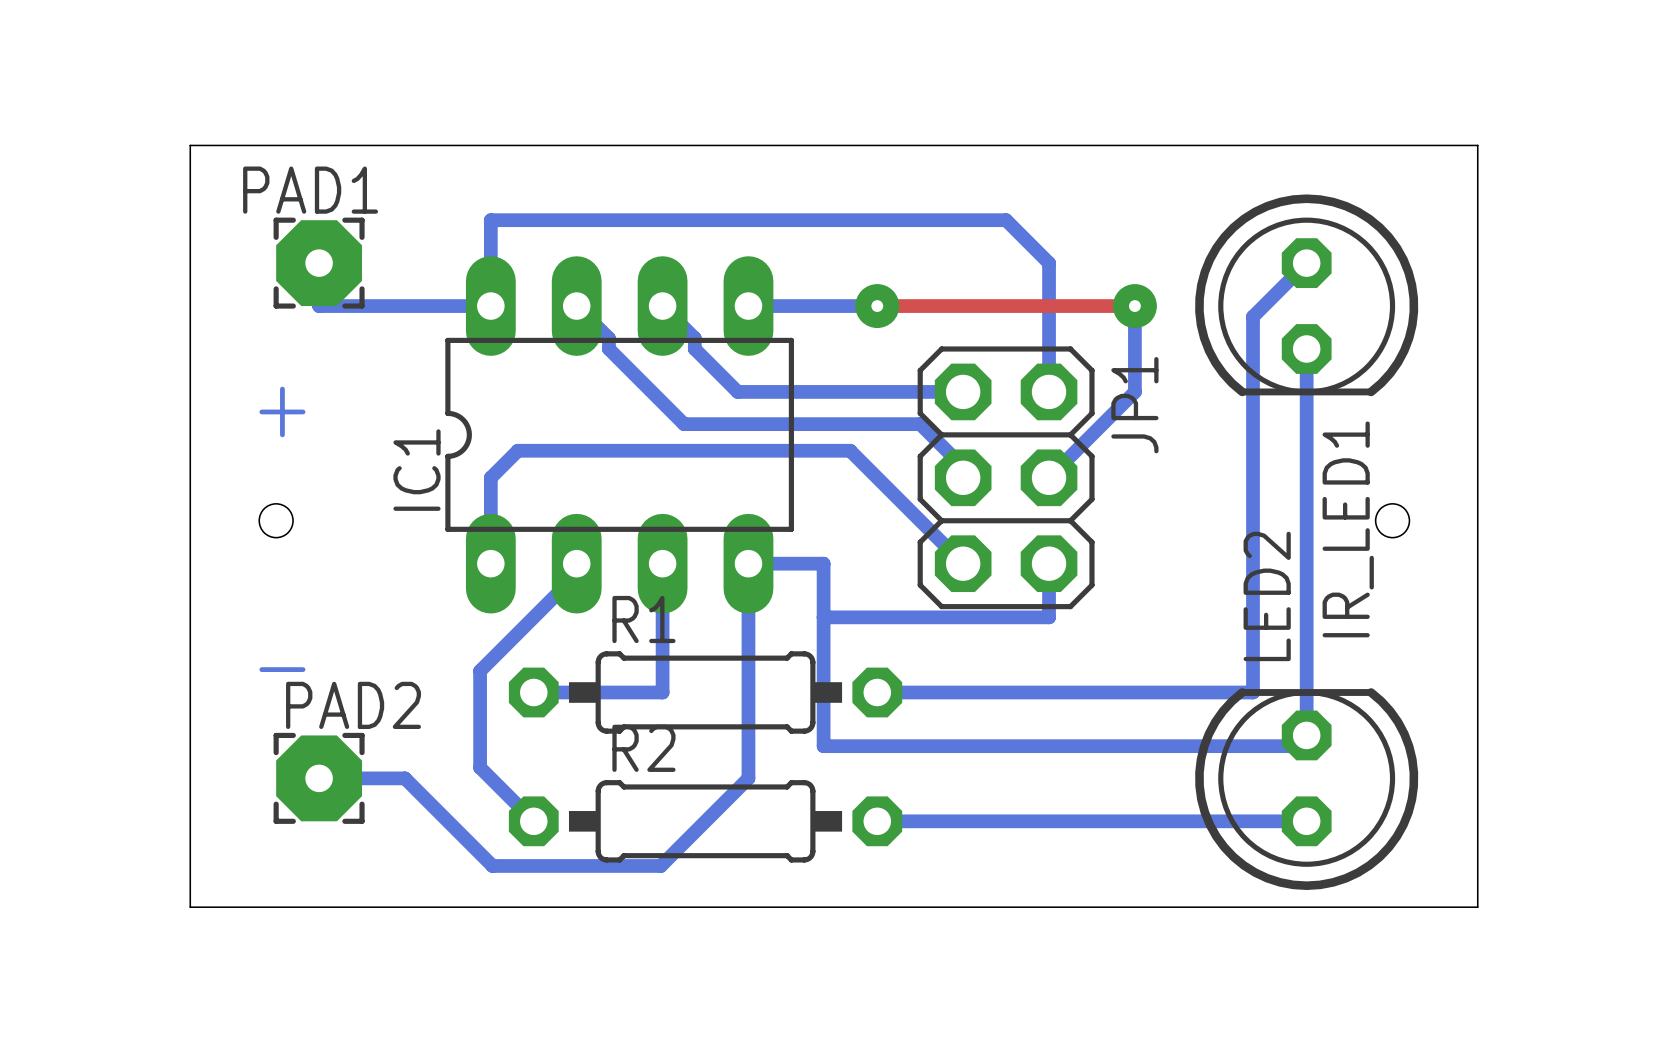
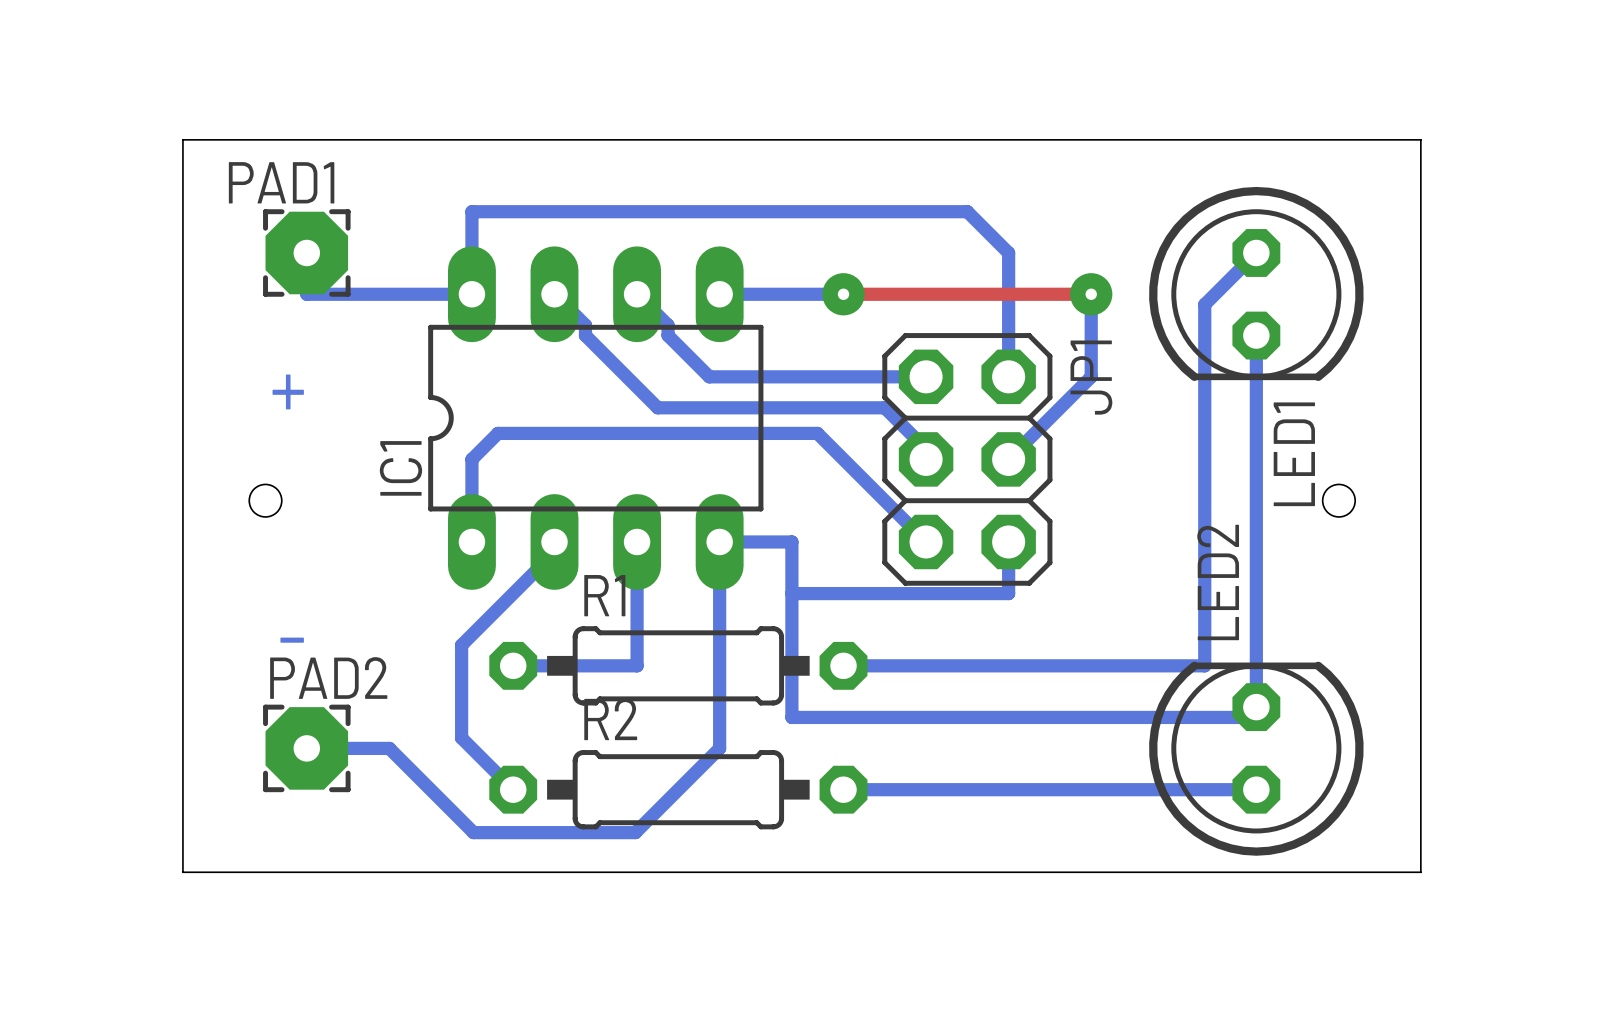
IR_LED1 name: IR_LED1 (1348, 529) -> LED1 (1294, 454)

